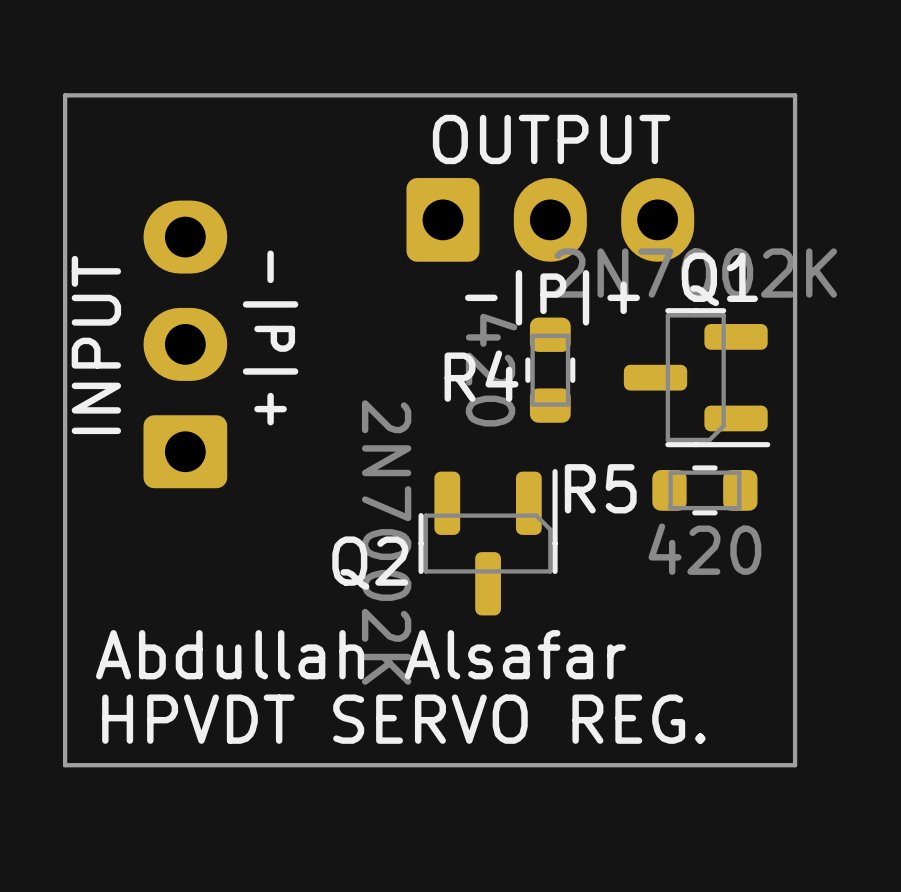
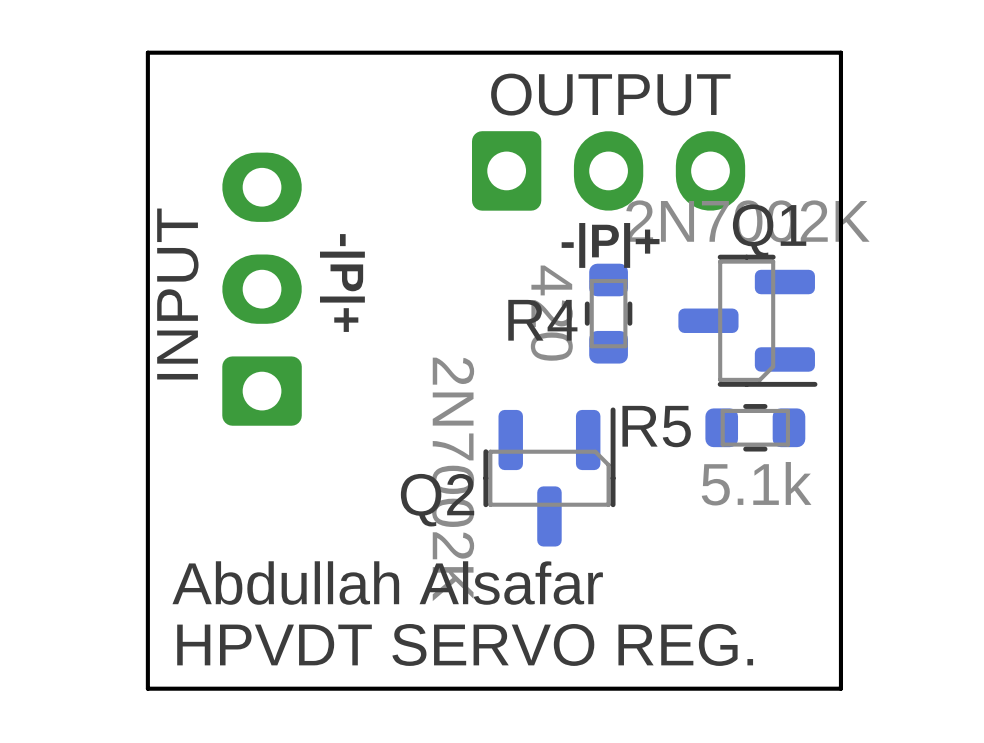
R5 value: 420 (704, 549) -> 5.1k (756, 483)

